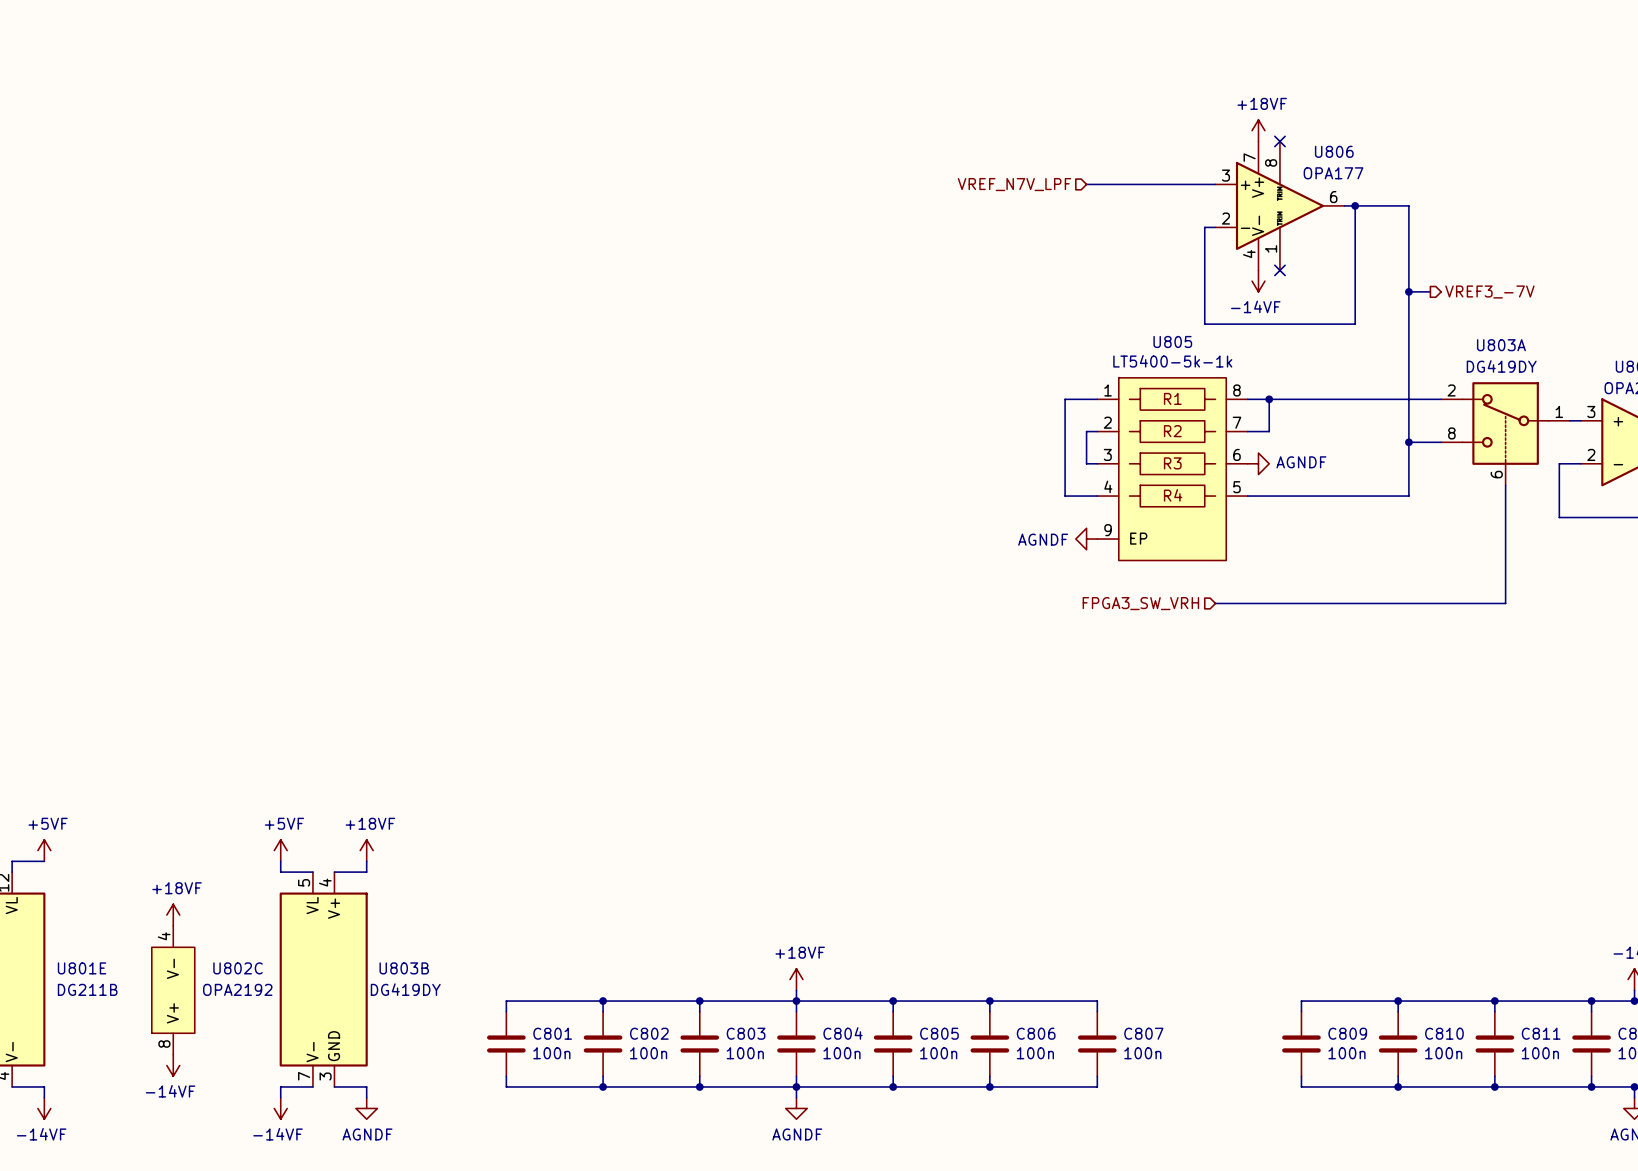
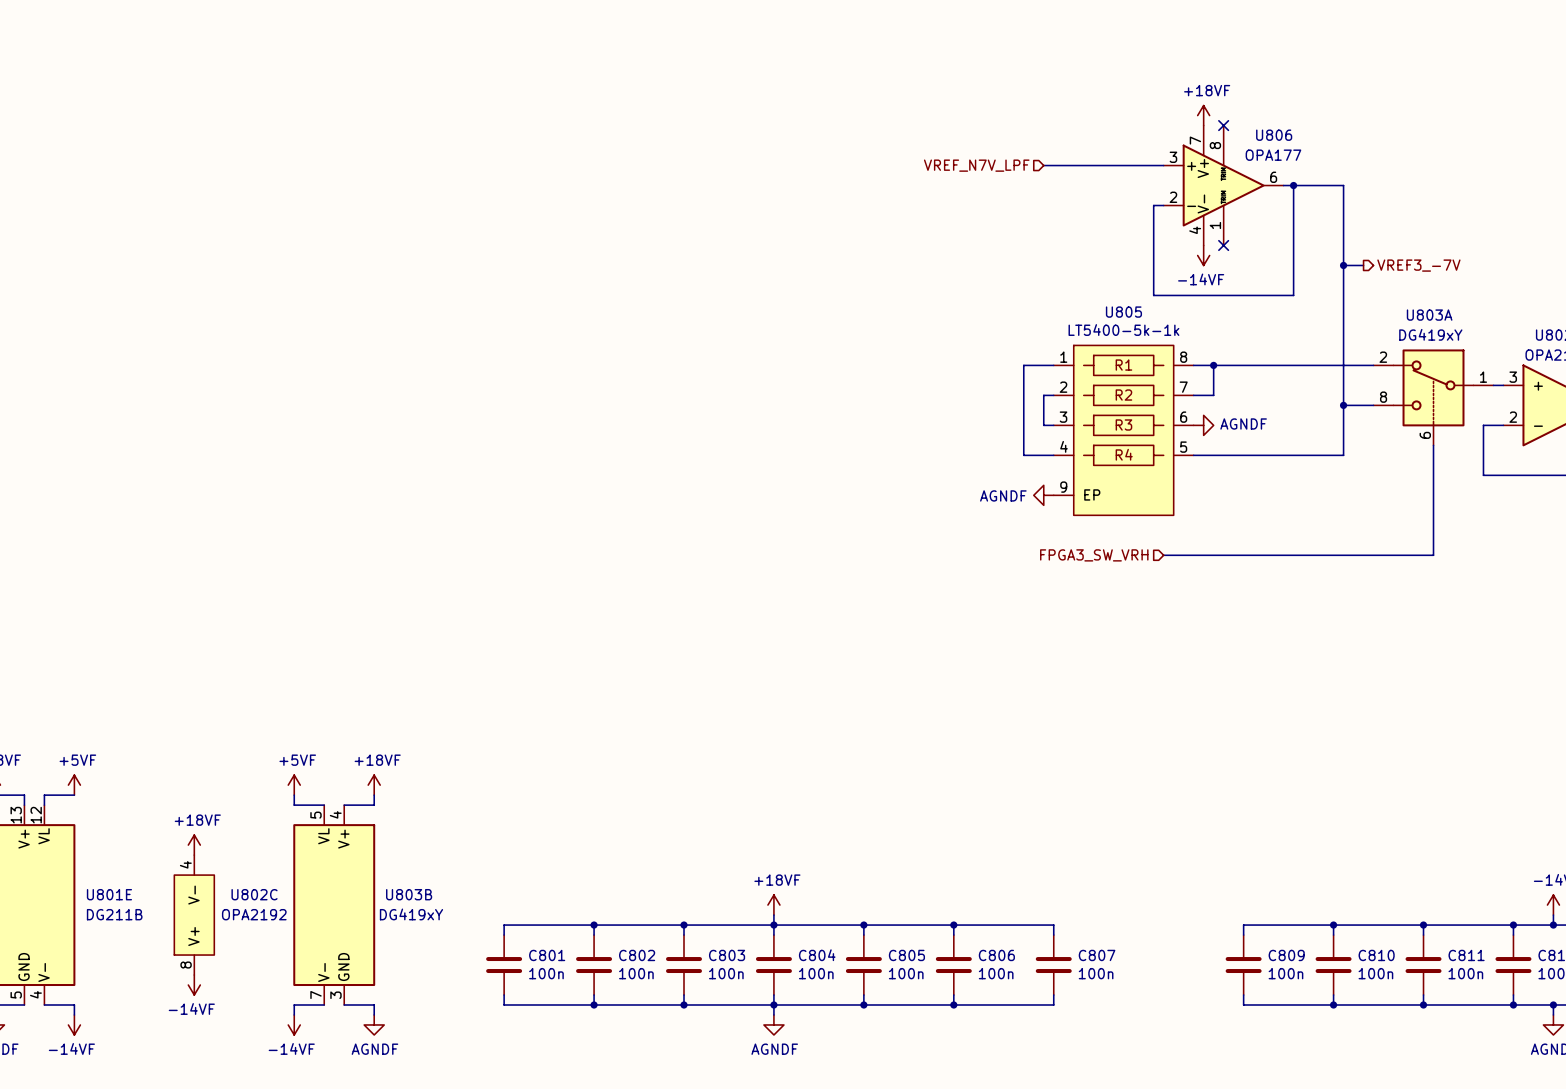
U803A value: DG419DY (1501, 366) -> DG419xY (1430, 334)
U803B value: DG419DY (405, 989) -> DG419xY (411, 914)

